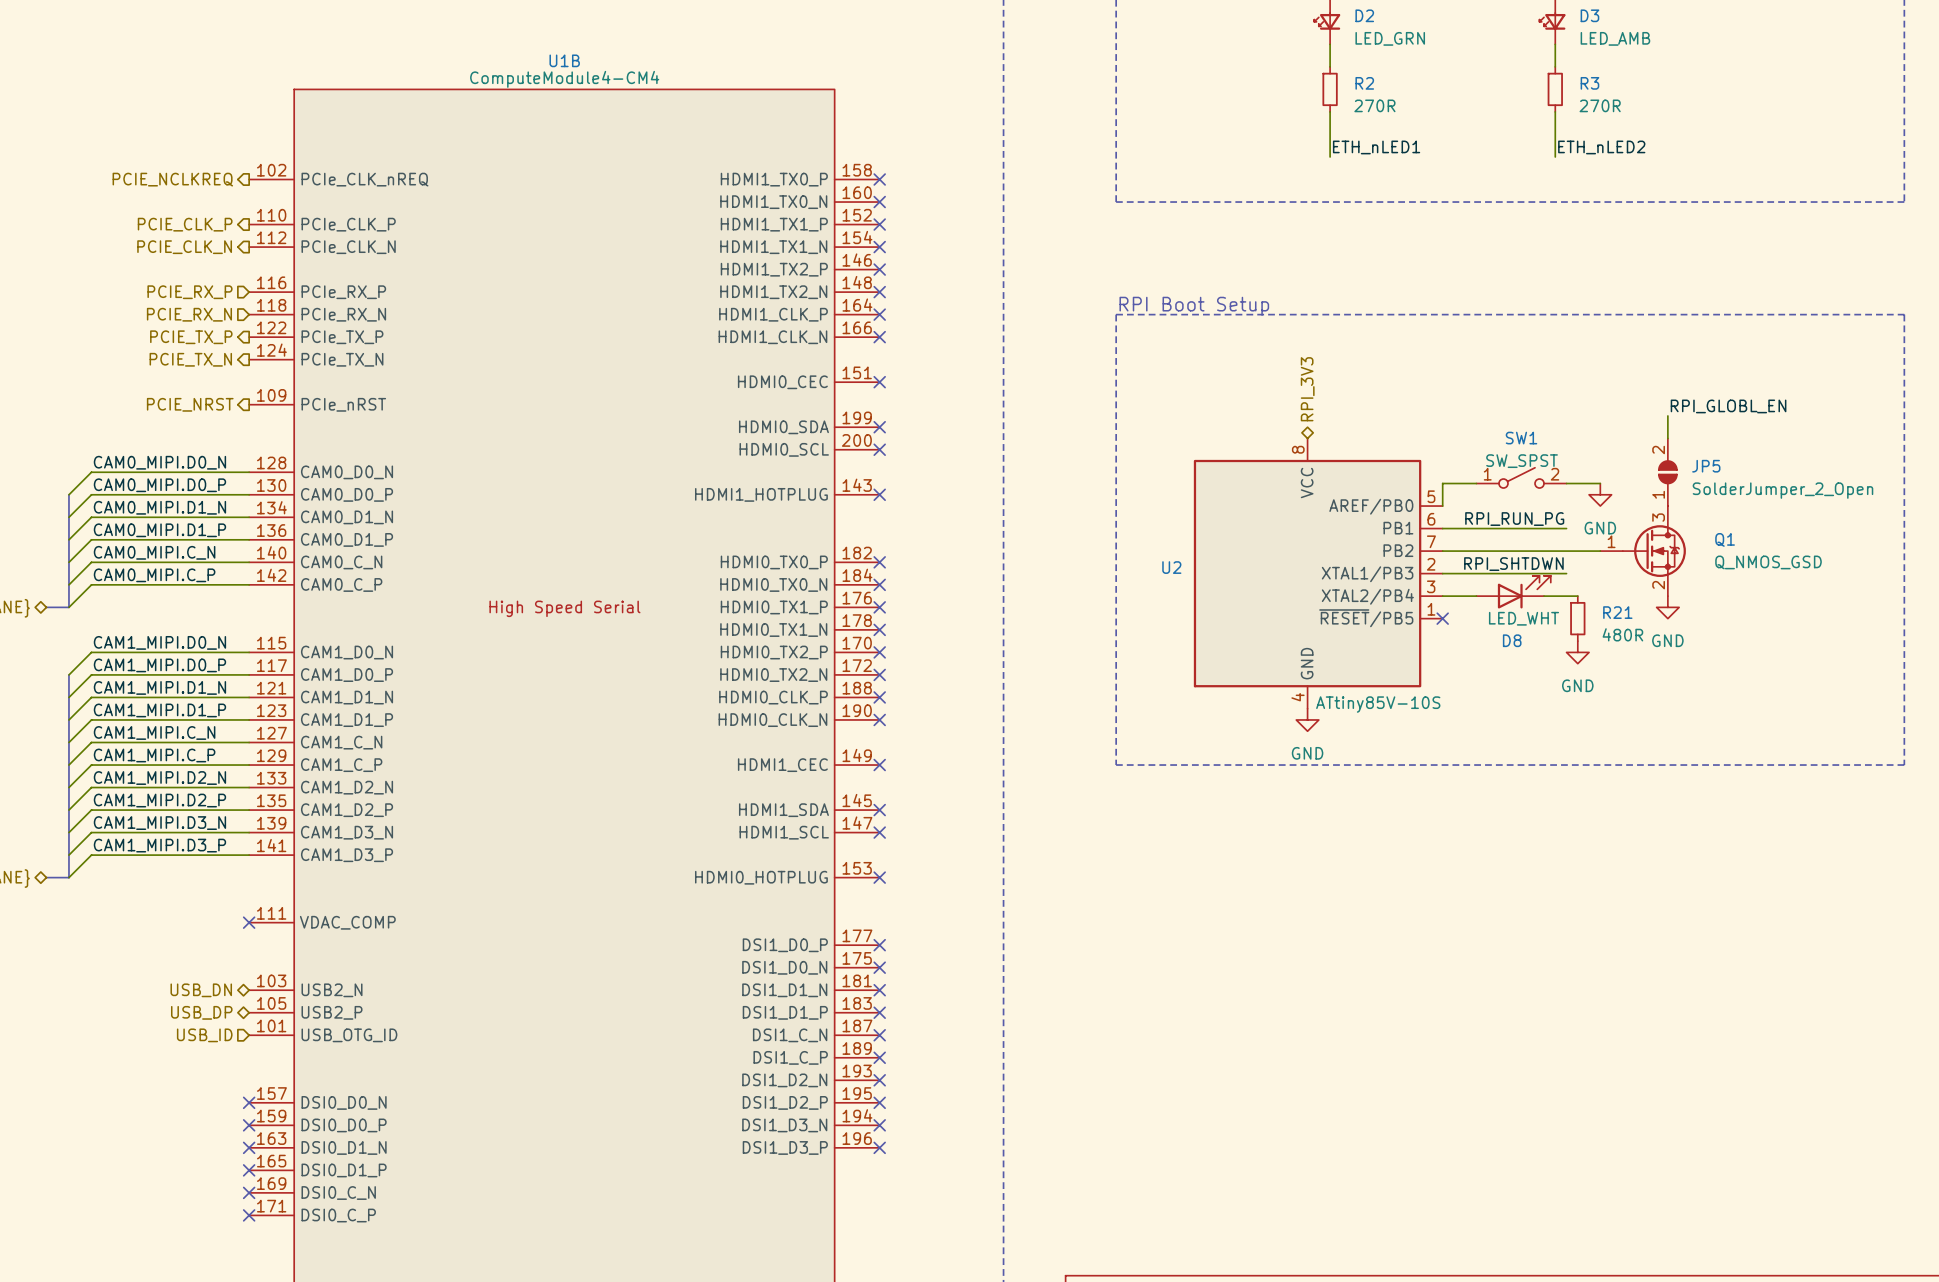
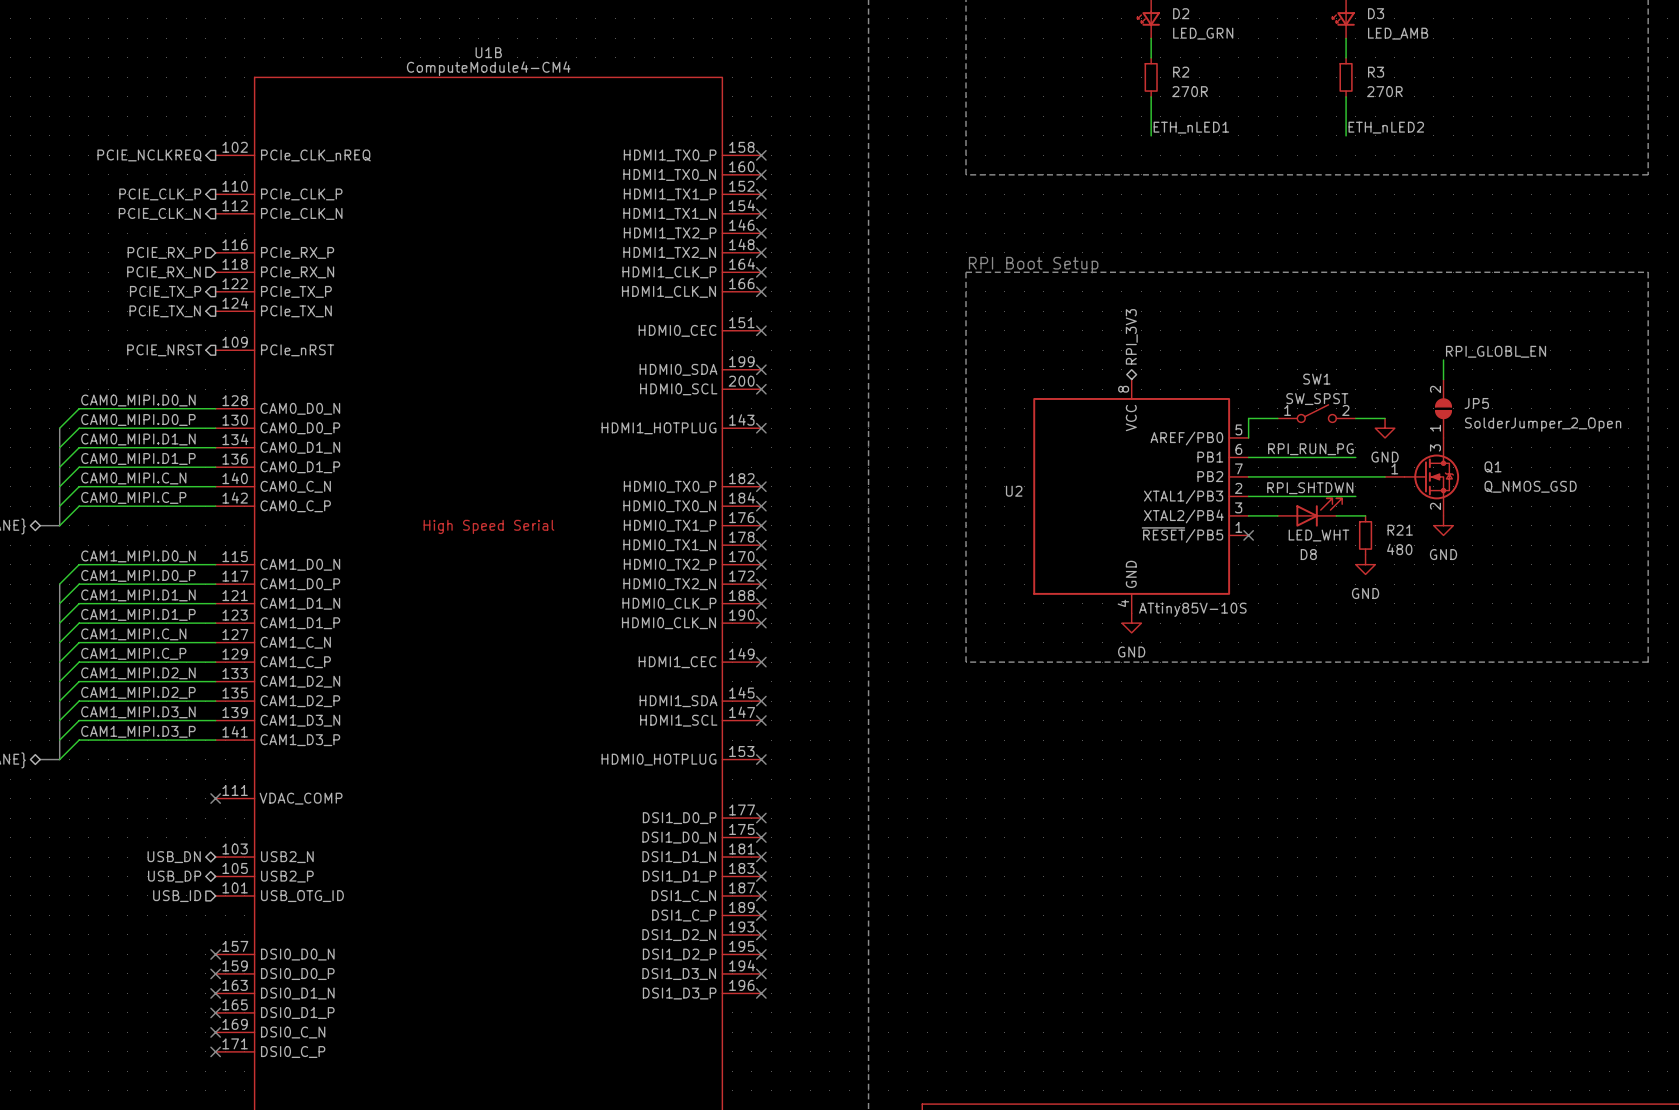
R21 value: 480R (1622, 634) -> 480 (1399, 549)

